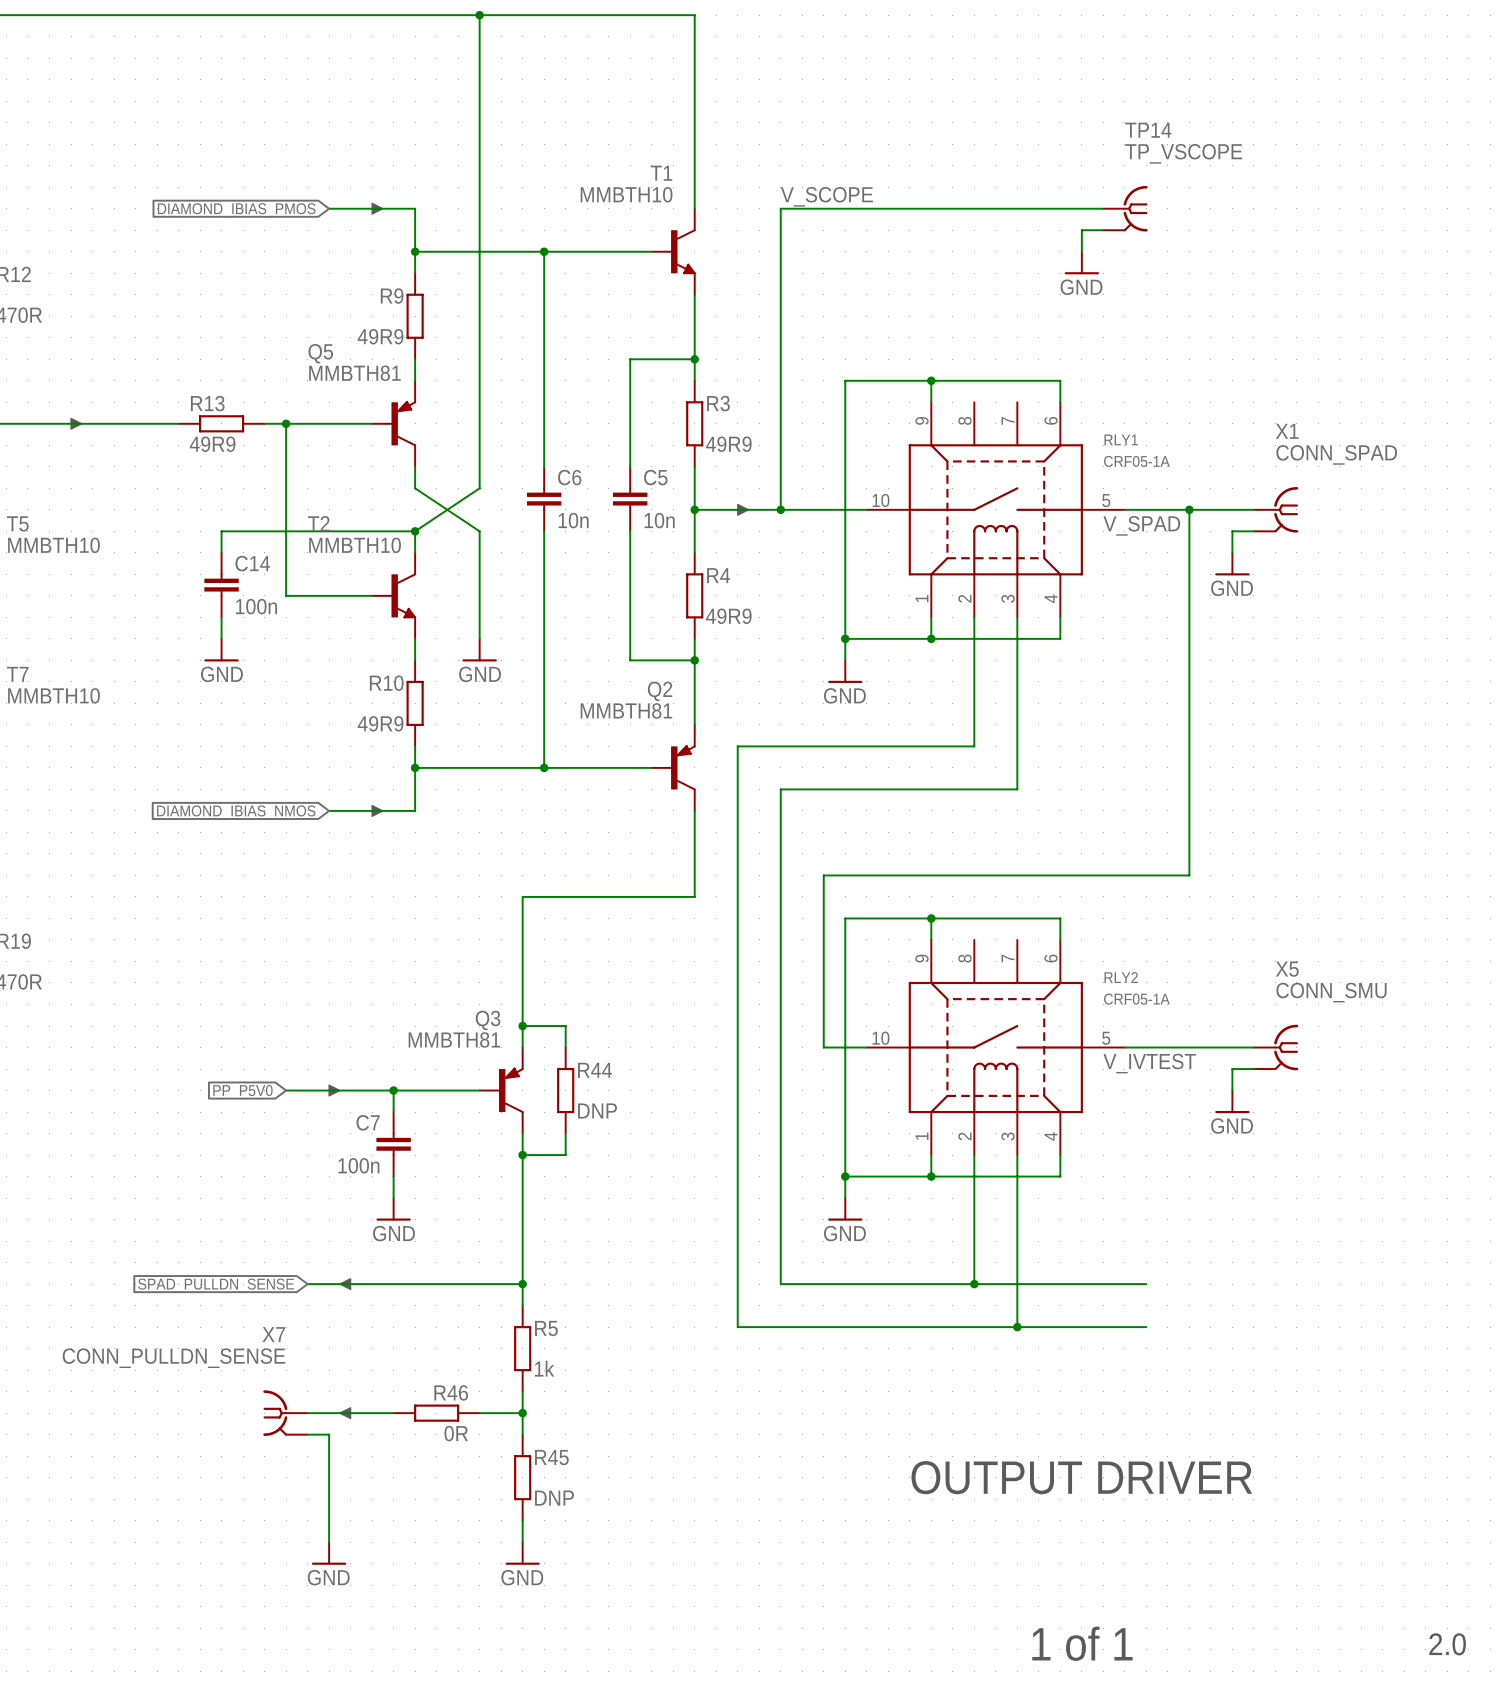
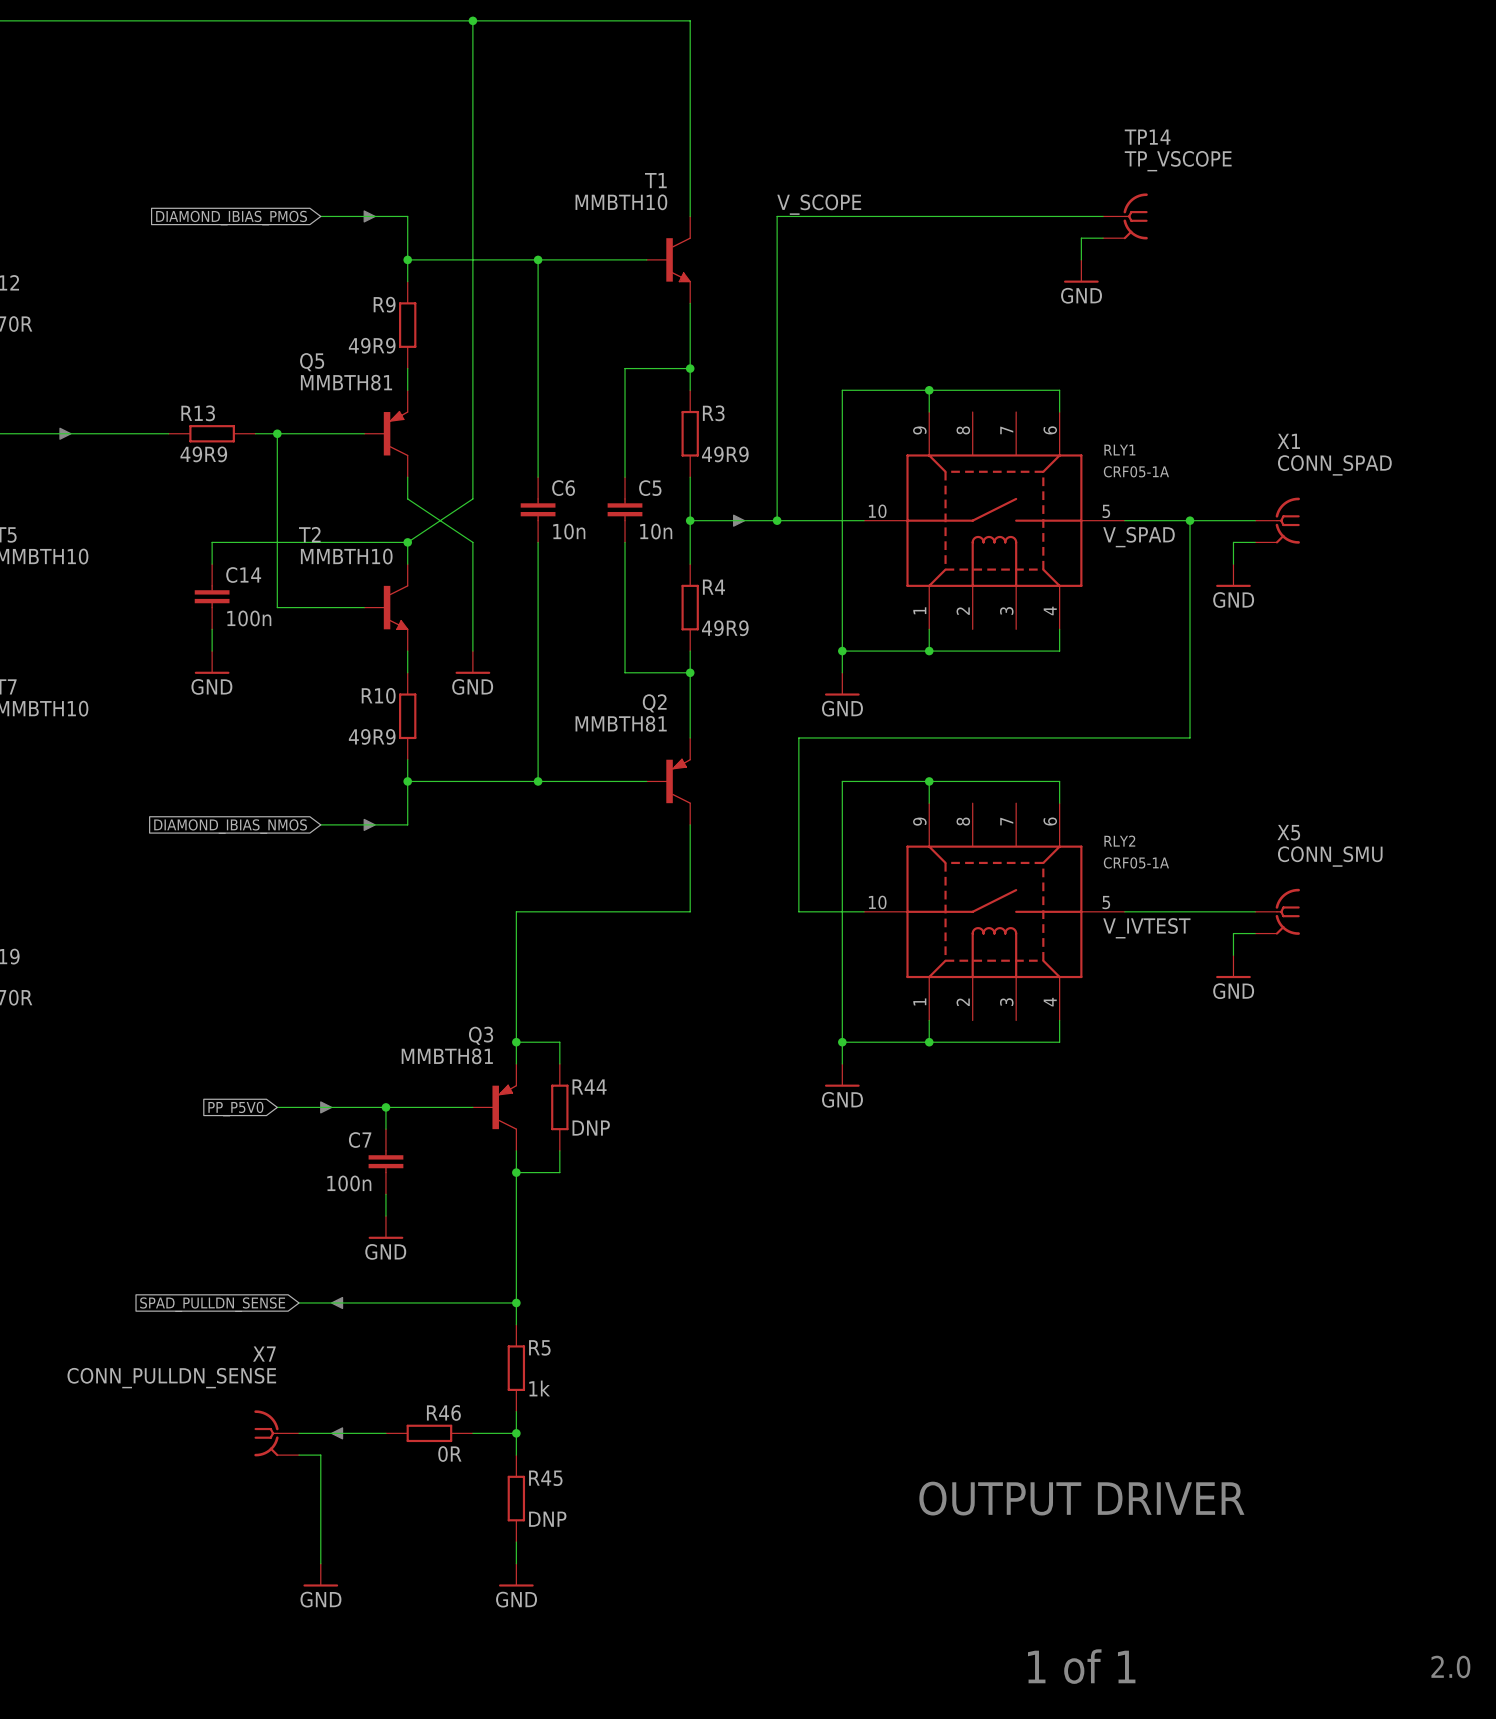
wire: (974, 617) (974, 746) (737, 746) (737, 1327) (1146, 1327) -> none
wire: (1017, 617) (1017, 789) (780, 789) (780, 1284) (1146, 1284) -> none
wire: (1189, 724) (1189, 875) (823, 875) (823, 1047) (866, 1047) -> (1190, 737) (798, 737) (798, 911) (864, 911)
junction: none -> (929, 781)
wire: (845, 918) (1060, 918) (1060, 939) -> (842, 933) (842, 781) (1059, 781) (1059, 803)
wire: (931, 918) (931, 939) -> (929, 781) (929, 803)
junction: (931, 918) -> none
junction: none -> (842, 1042)
junction: none -> (929, 1042)
wire: (845, 1047) (845, 1198) -> none
RLY2 position: (995, 1047) -> (994, 911)
wire: (1124, 1047) (1253, 1047) -> (1124, 911) (1255, 911)
X5 position: (1276, 1047) -> (1277, 911)
label position: V_IVTEST (1149, 1063) -> V_IVTEST (1146, 928)
wire: (1253, 1069) (1232, 1069) (1232, 1090) -> (1255, 933) (1233, 933) (1233, 955)
power symbol position: GND (1232, 1101) -> GND (1233, 966)
wire: (931, 1155) (931, 1176) -> (929, 1020) (929, 1042)
wire: (974, 1155) (974, 1284) -> none
wire: (1017, 1155) (1017, 1327) -> none
wire: (1060, 1155) (1060, 1176) (845, 1176) -> (1059, 1020) (1059, 1042) (842, 1042)
junction: (845, 1176) -> none
junction: (931, 1176) -> none
power symbol position: GND (845, 1209) -> GND (842, 1075)
junction: (974, 1284) -> none
junction: (1017, 1327) -> none

